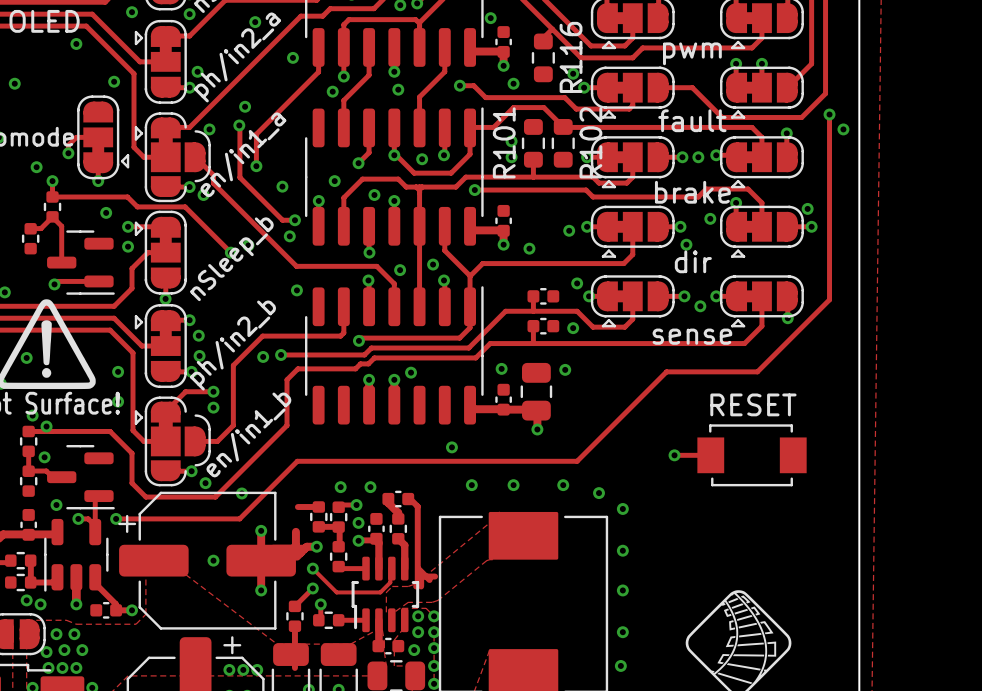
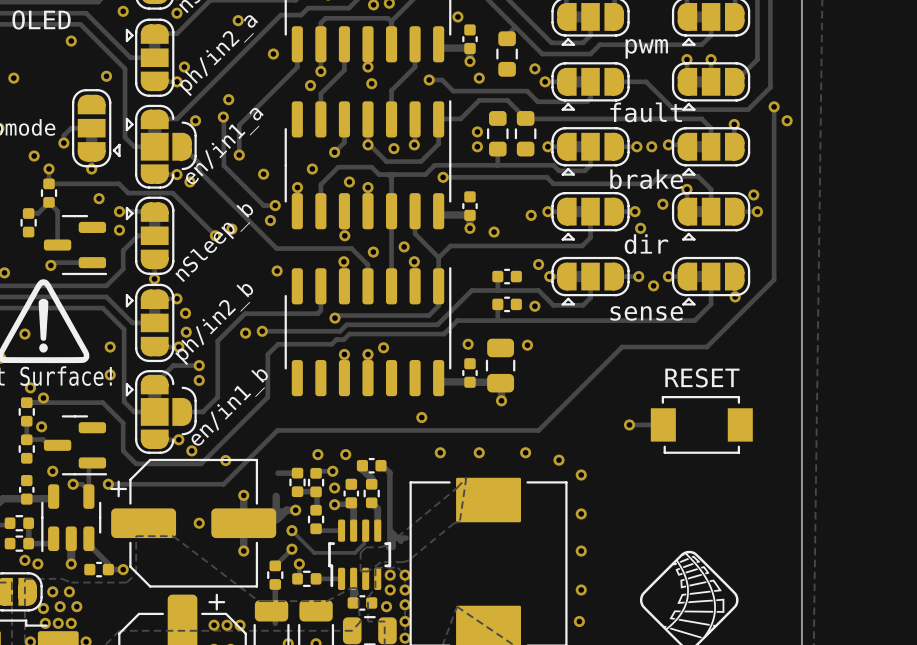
R116 name: R116 (571, 57) -> none
R101 name: R101 (504, 142) -> none
R102 name: R102 (590, 142) -> none

